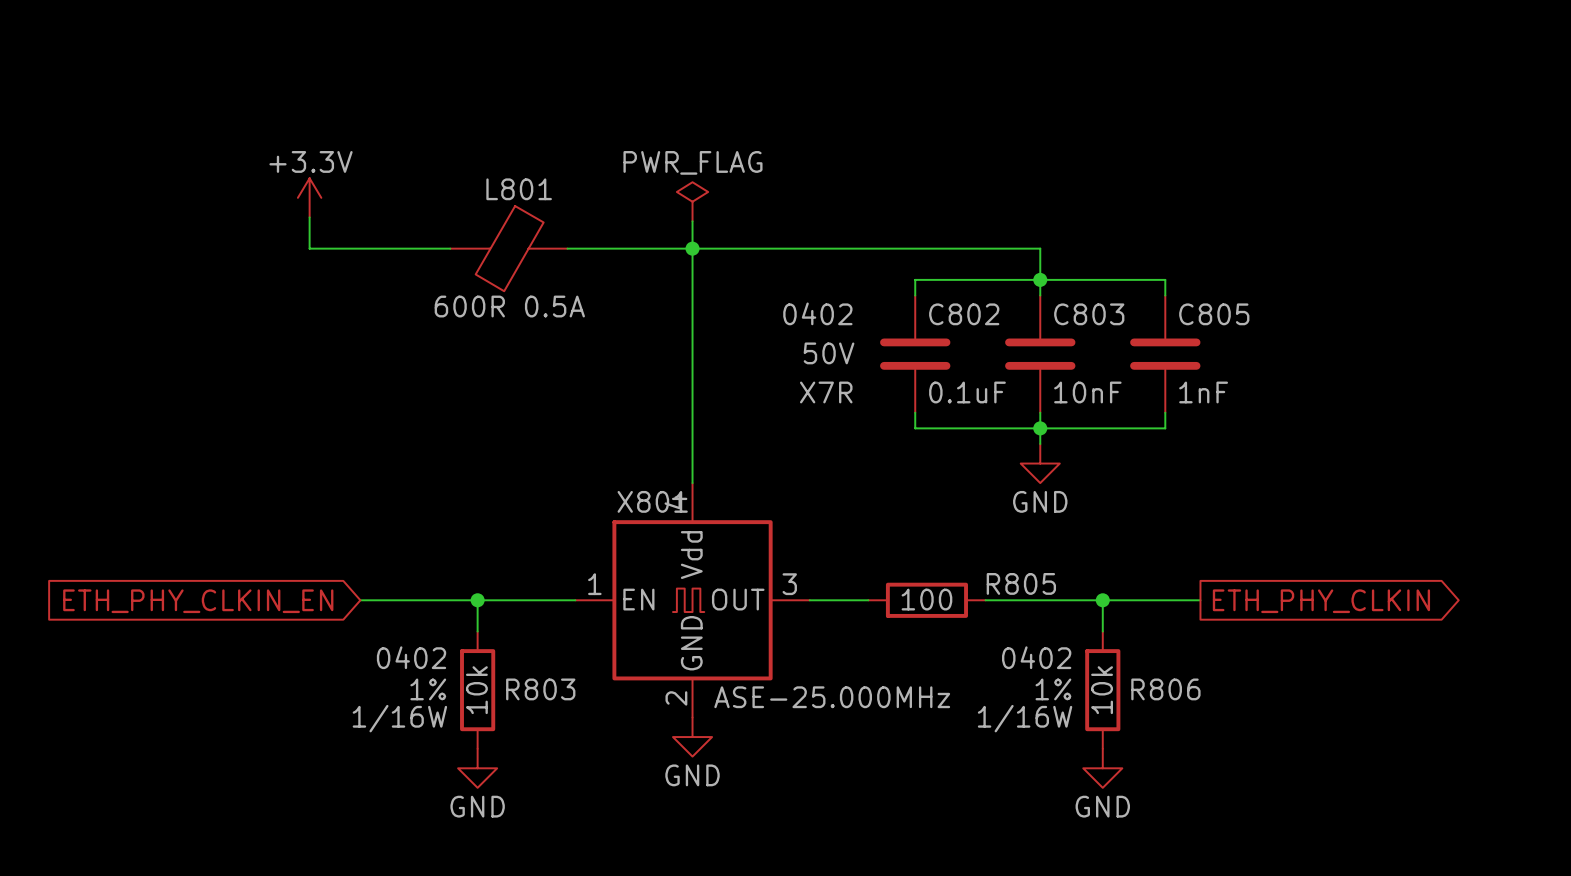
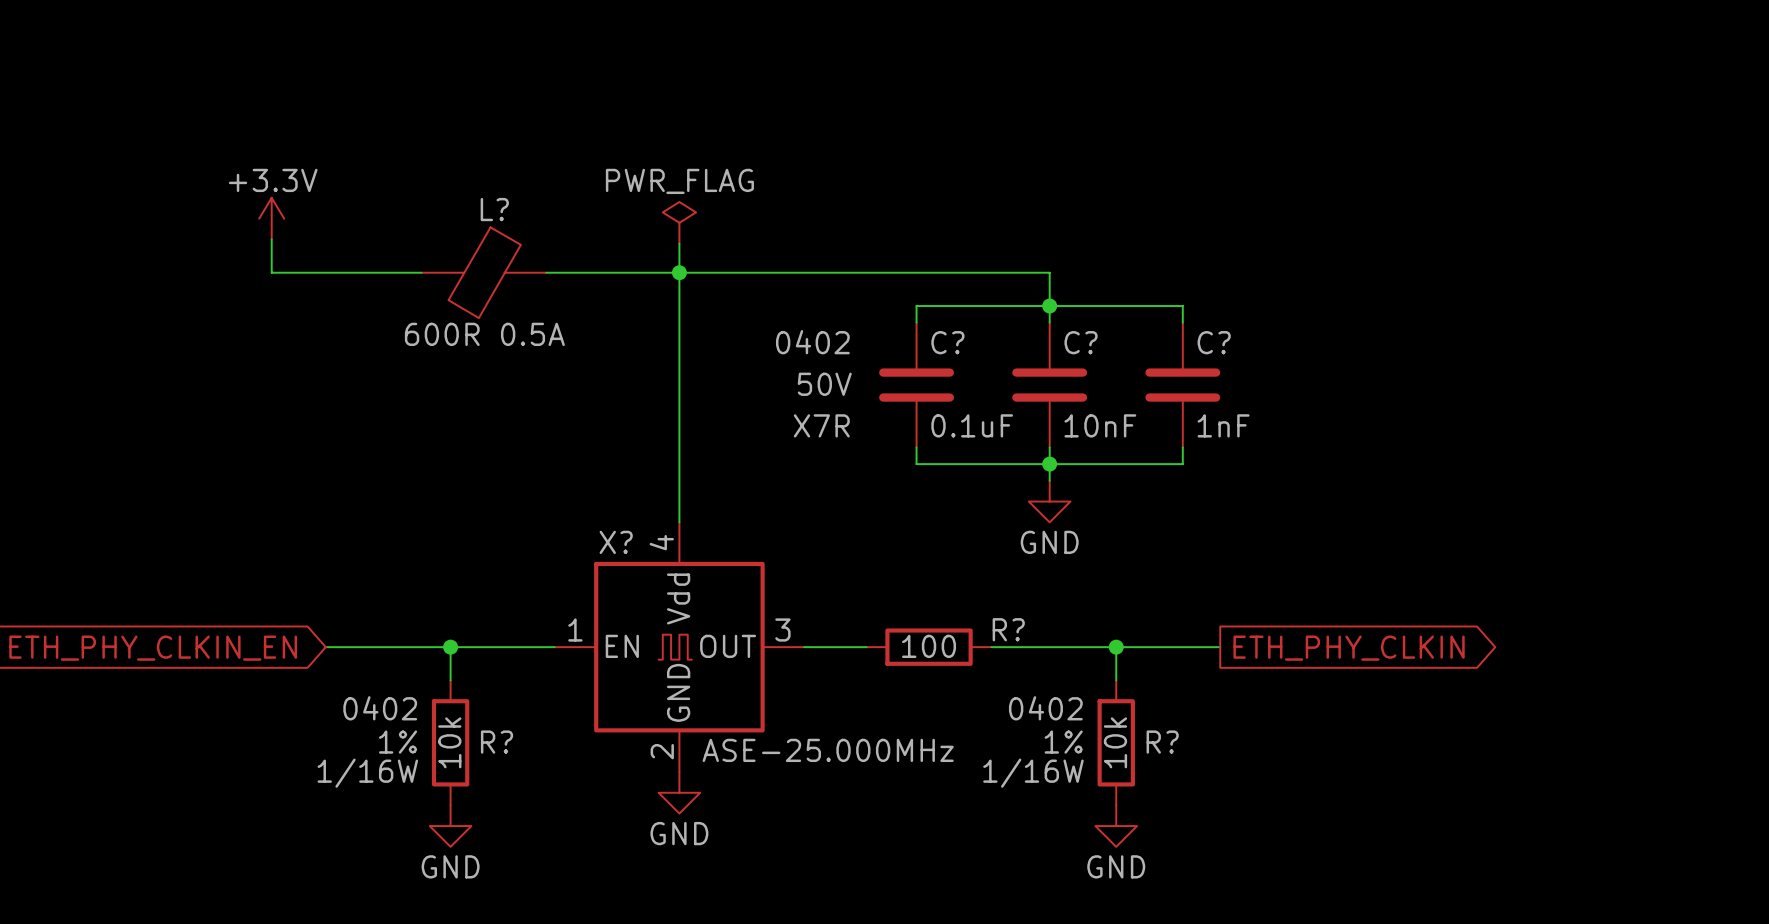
L801 name: L801 (519, 189) -> L? (494, 209)
C802 name: C802 (964, 314) -> C? (947, 342)
C803 name: C803 (1089, 314) -> C? (1081, 342)
C805 name: C805 (1214, 314) -> C? (1214, 342)
X801 name: X801 (652, 501) -> X? (616, 542)
R805 name: R805 (1021, 583) -> R? (1008, 629)
R803 name: R803 (540, 689) -> R? (497, 742)
R806 name: R806 (1165, 689) -> R? (1162, 742)

